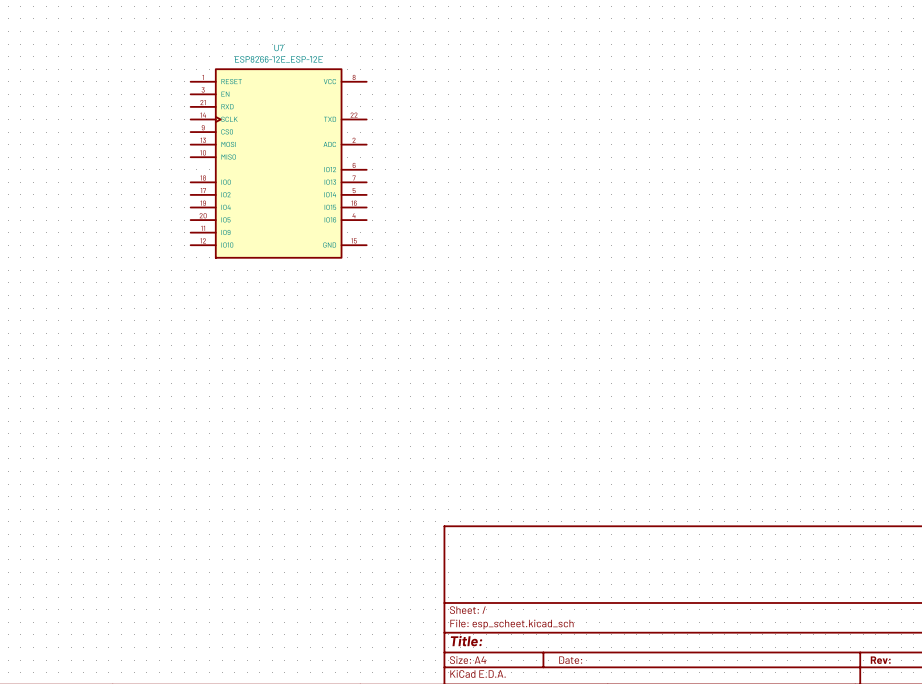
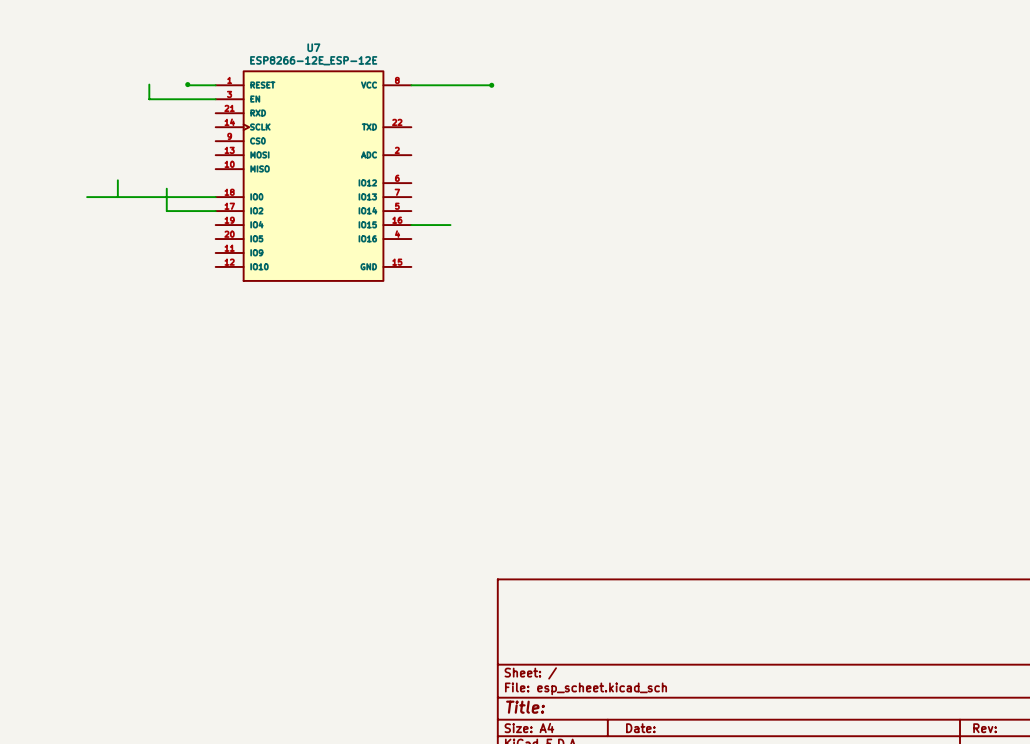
wire: none -> (149, 84) (149, 99) (215, 99)
wire: none -> (187, 84) (215, 85)
junction: none -> (187, 84)
wire: none -> (411, 85) (491, 85)
junction: none -> (491, 85)
wire: none -> (117, 180) (117, 197)
wire: none -> (166, 188) (166, 211) (215, 211)
wire: none -> (87, 197) (215, 197)
wire: none -> (411, 225) (450, 225)

